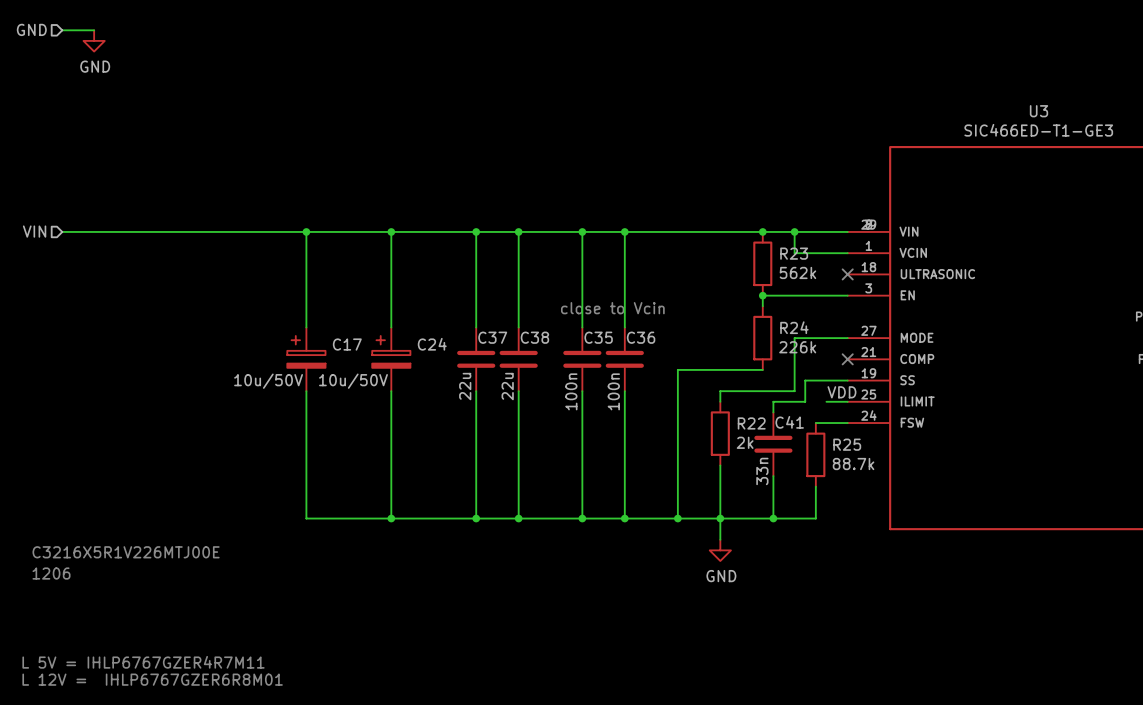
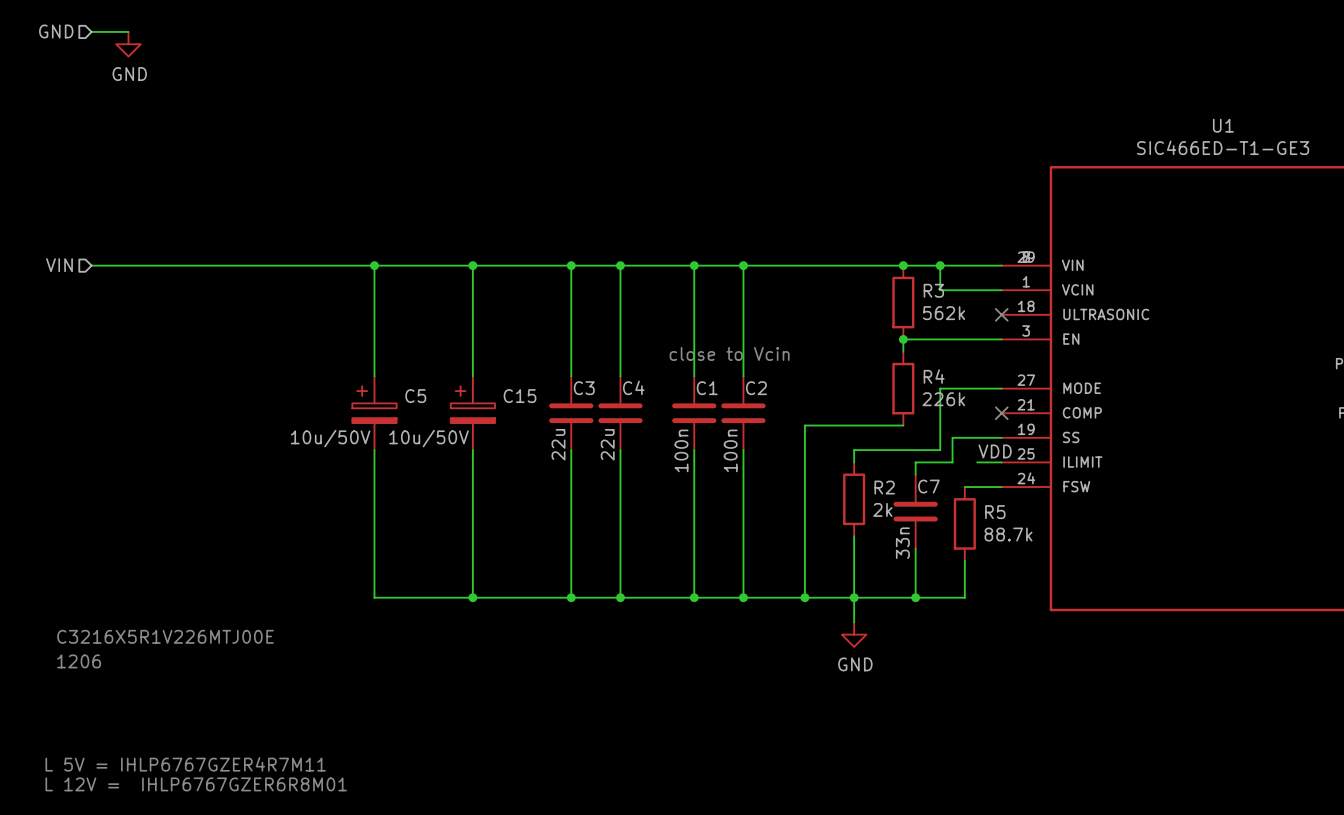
U3 name: U3 (1038, 111) -> U1 (1223, 125)
R23 name: R23 (794, 253) -> R3 (933, 290)
R24 name: R24 (794, 327) -> R4 (934, 376)
C37 name: C37 (492, 337) -> C3 (584, 388)
C38 name: C38 (534, 337) -> C4 (633, 387)
C35 name: C35 (598, 337) -> C1 (707, 388)
C36 name: C36 (641, 337) -> C2 (756, 388)
C17 name: C17 (347, 344) -> C5 (415, 396)
C24 name: C24 (432, 344) -> C15 (520, 396)
C41 name: C41 (789, 422) -> C7 (928, 486)
R22 name: R22 (751, 423) -> R2 (884, 487)
R25 name: R25 (847, 444) -> R5 (995, 512)

